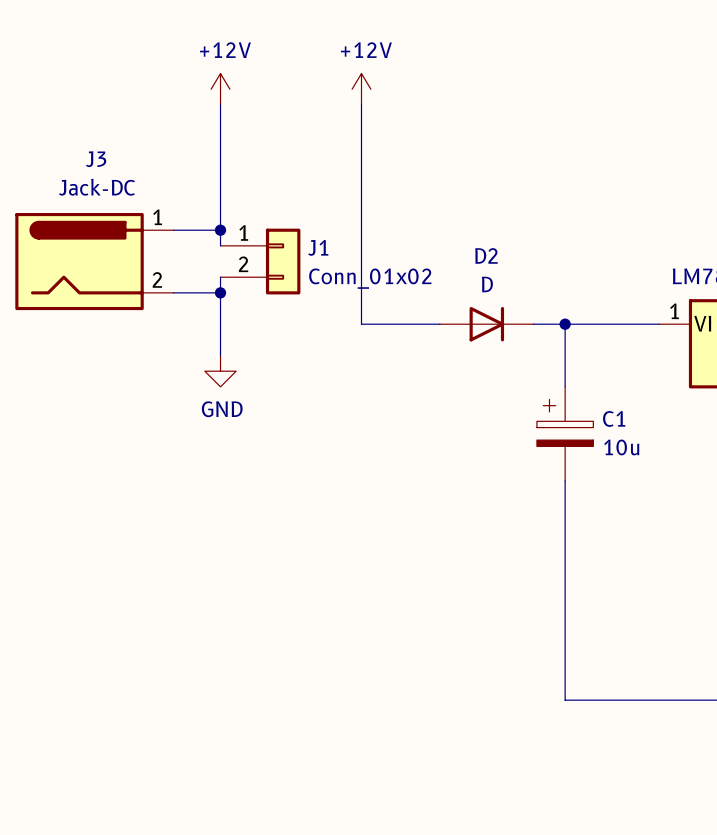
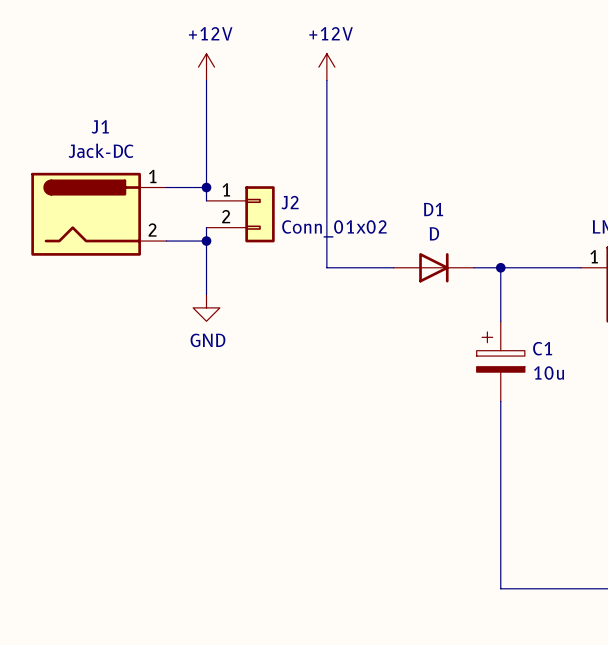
J3 name: J3 (96, 159) -> J1 (100, 126)
J1 name: J1 (318, 247) -> J2 (290, 202)
D2 name: D2 (486, 255) -> D1 (433, 209)

